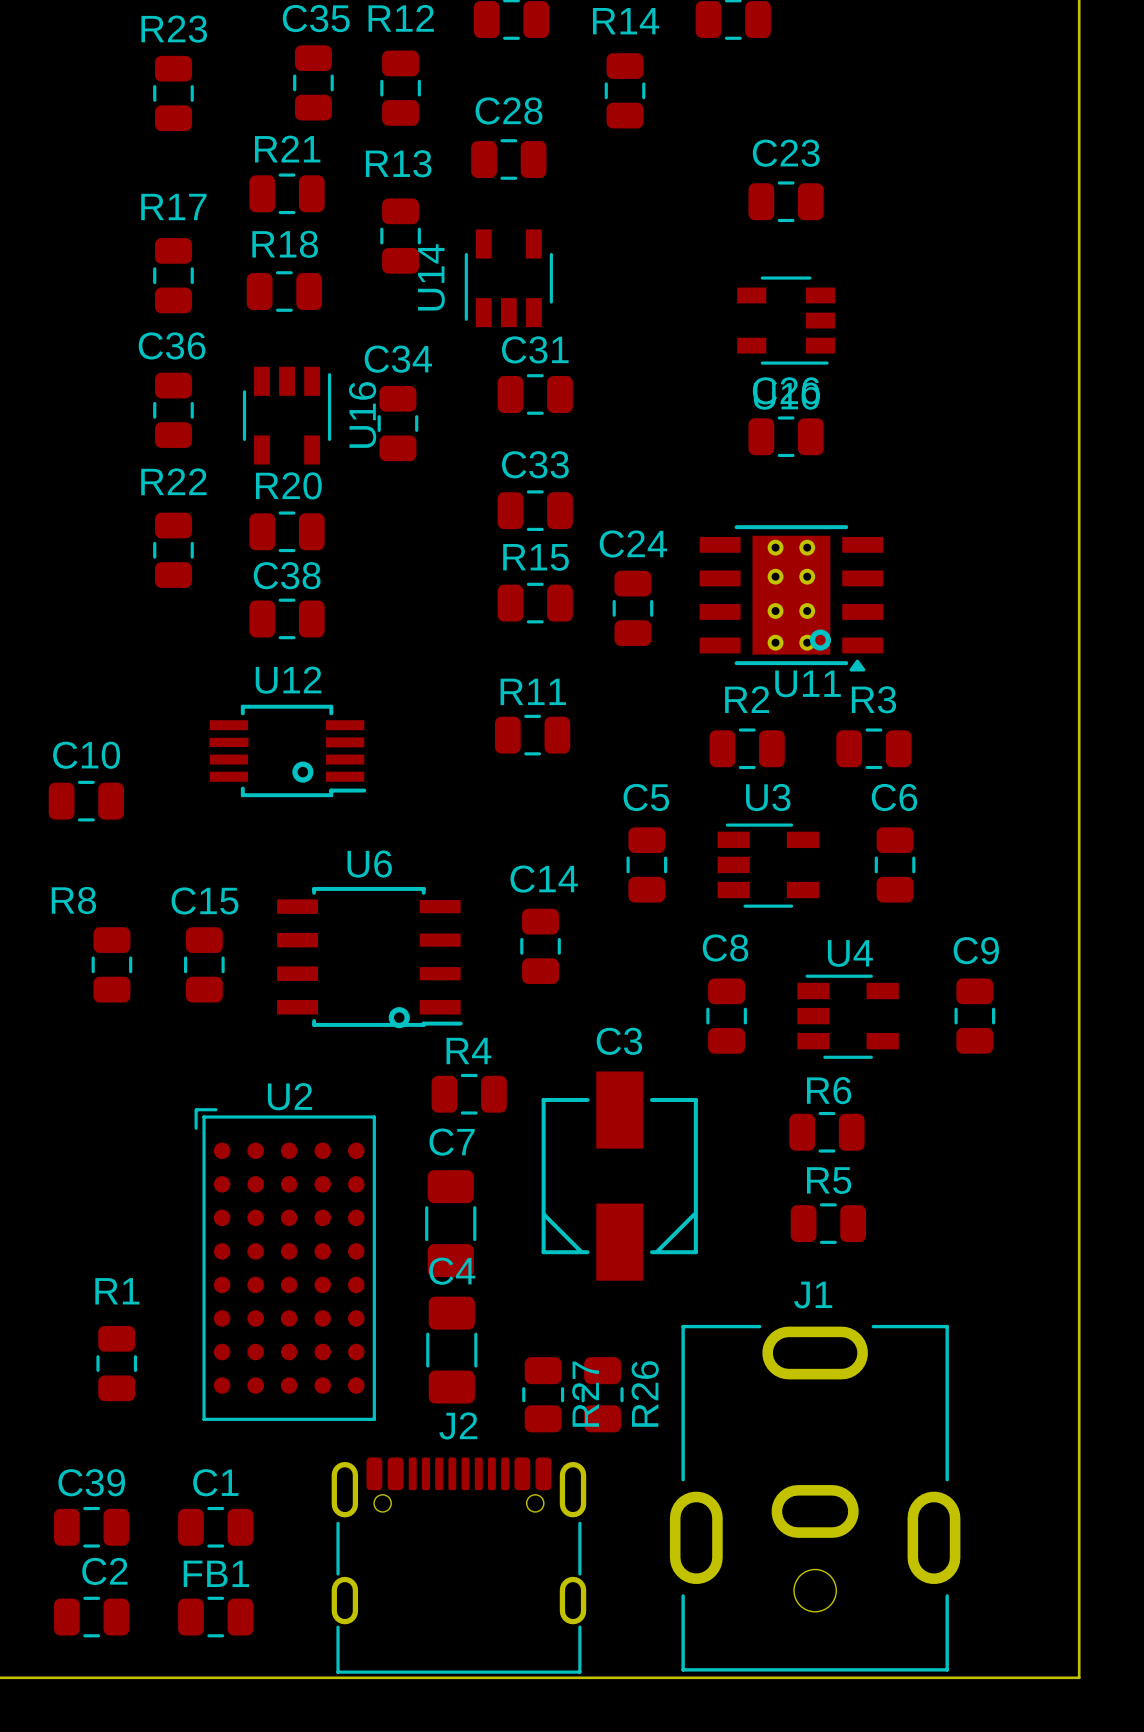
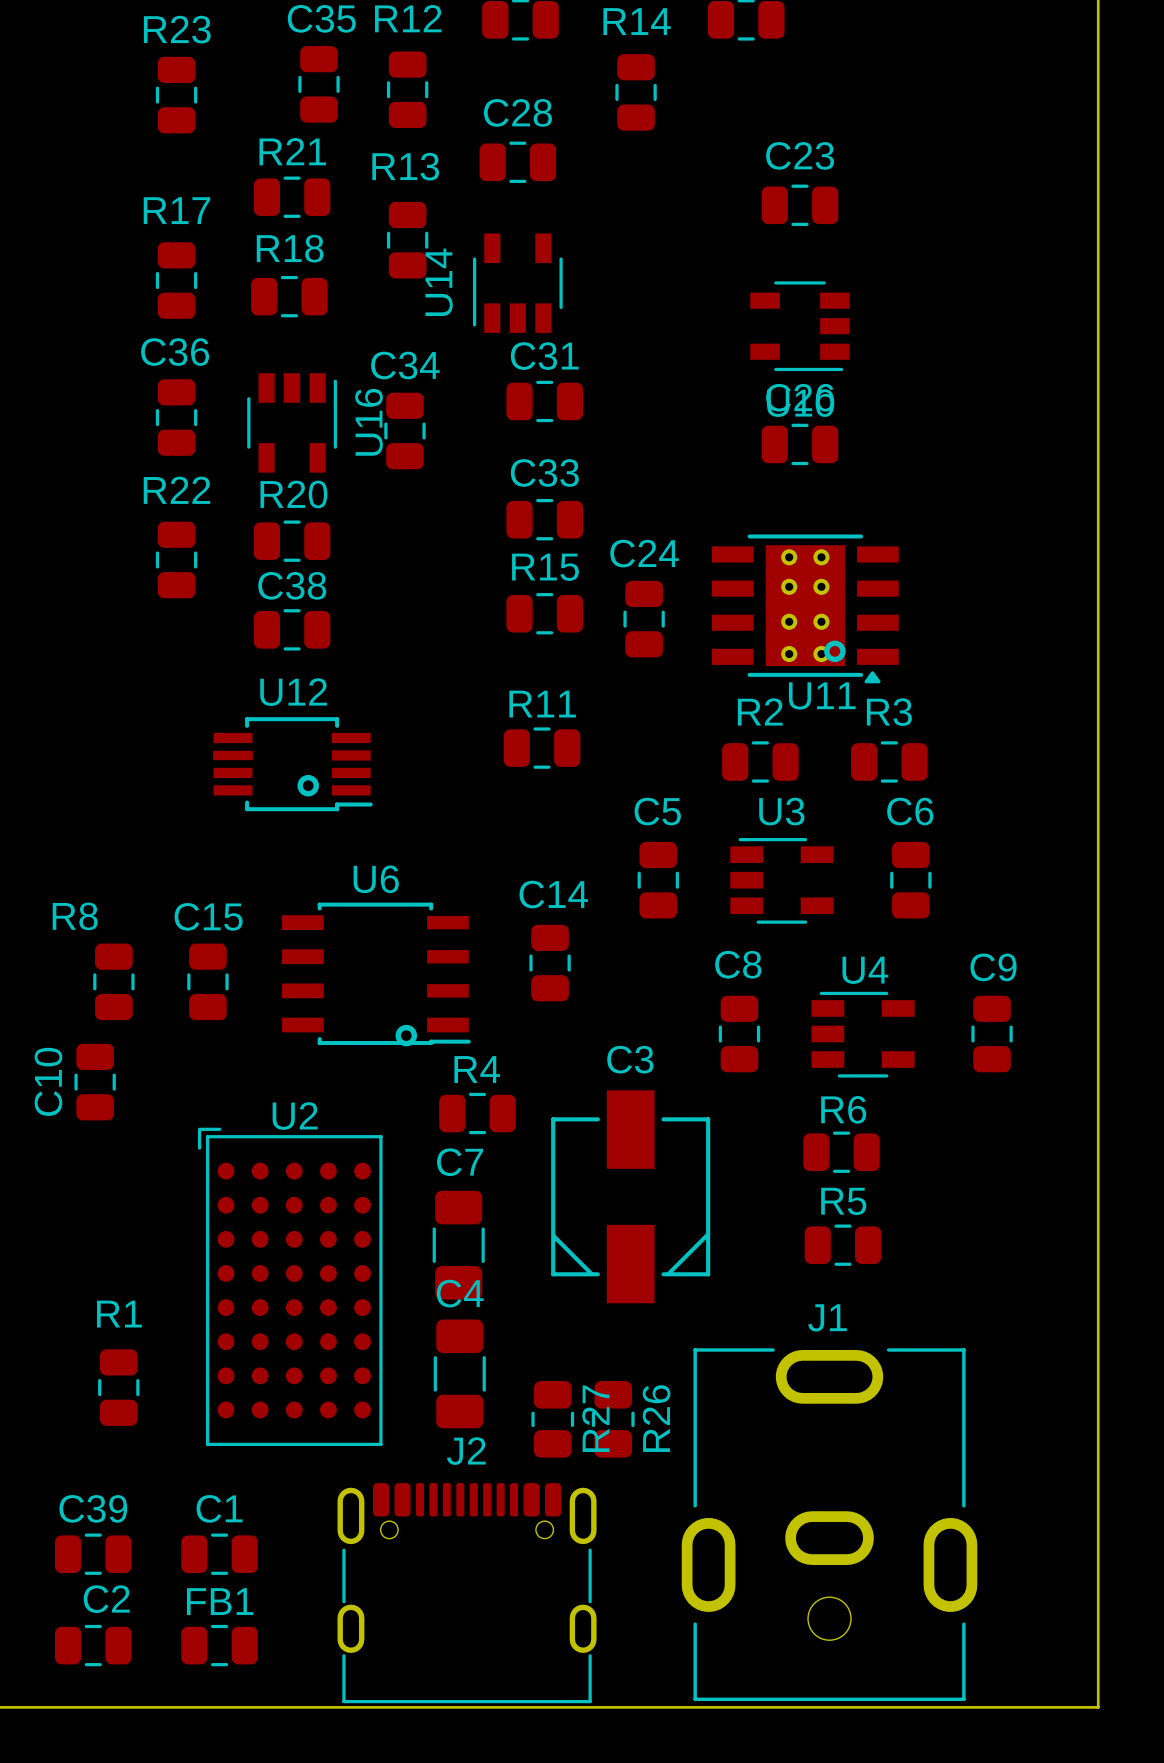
C10 name position: C10 (86, 755) -> C10 (48, 1081)
C10 rotation: 0° (86, 801) -> 90° clockwise (95, 1082)
C10 position: (86, 801) -> (95, 1082)

